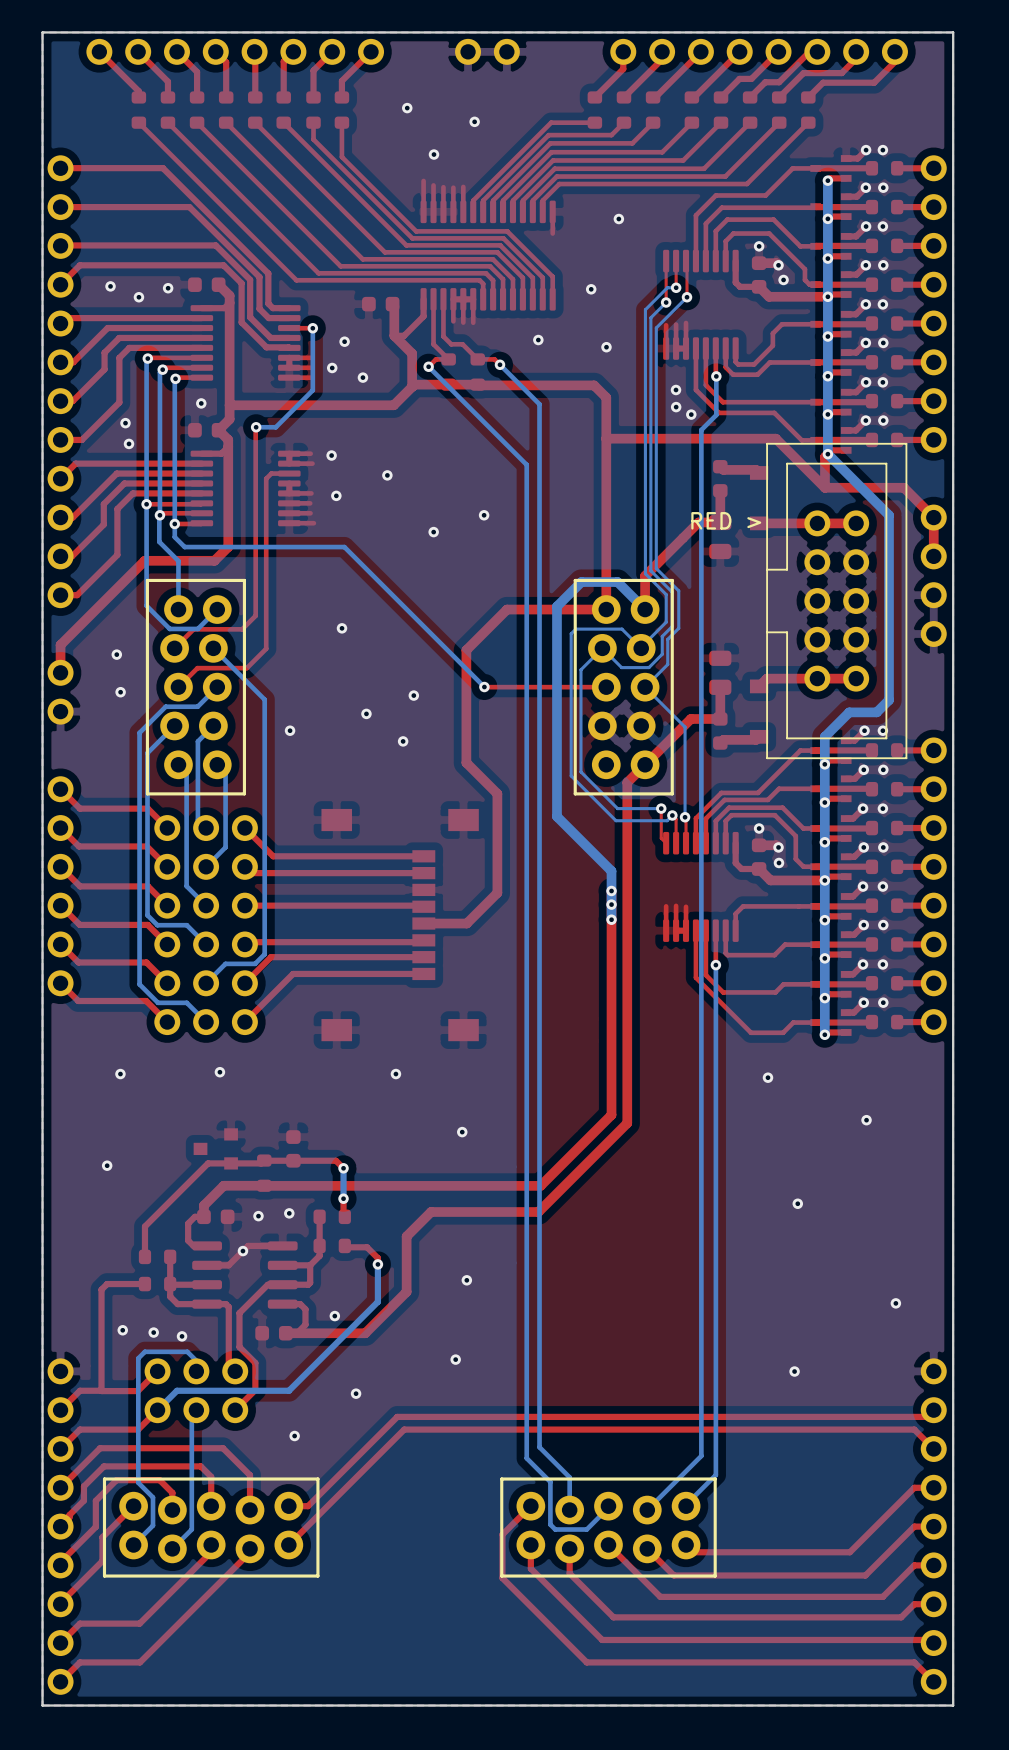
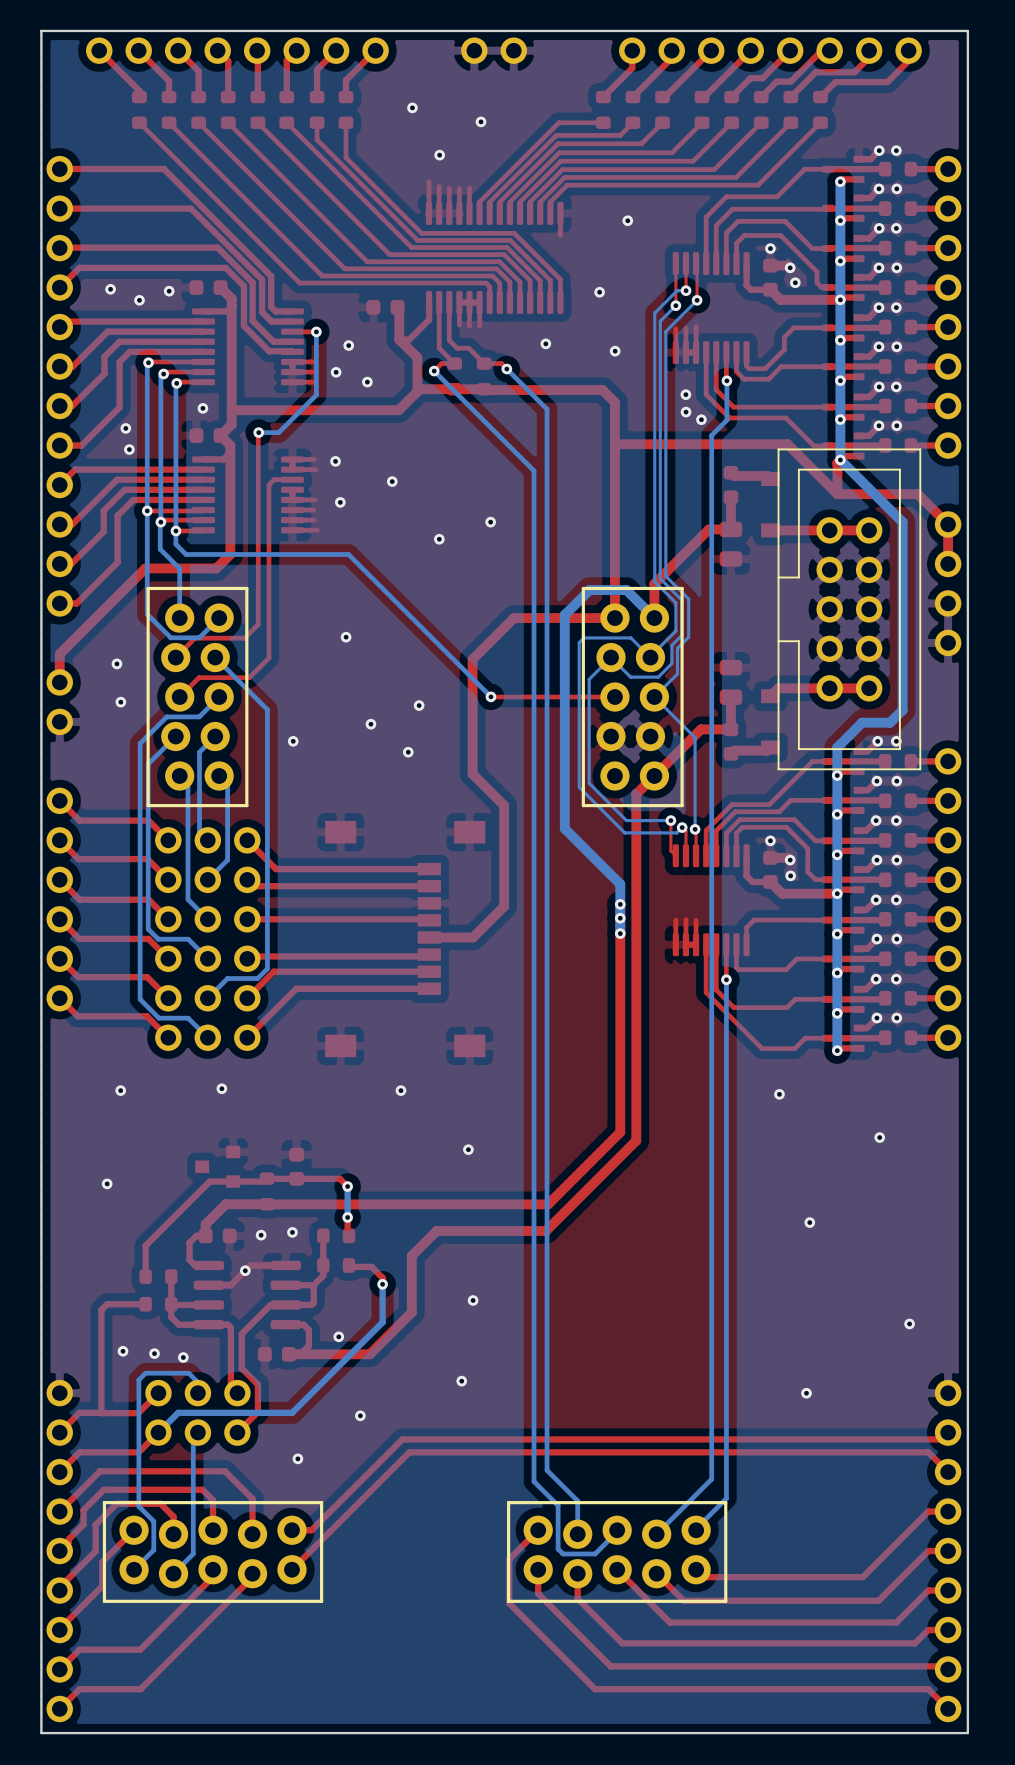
text: RED > (726, 520) -> none

